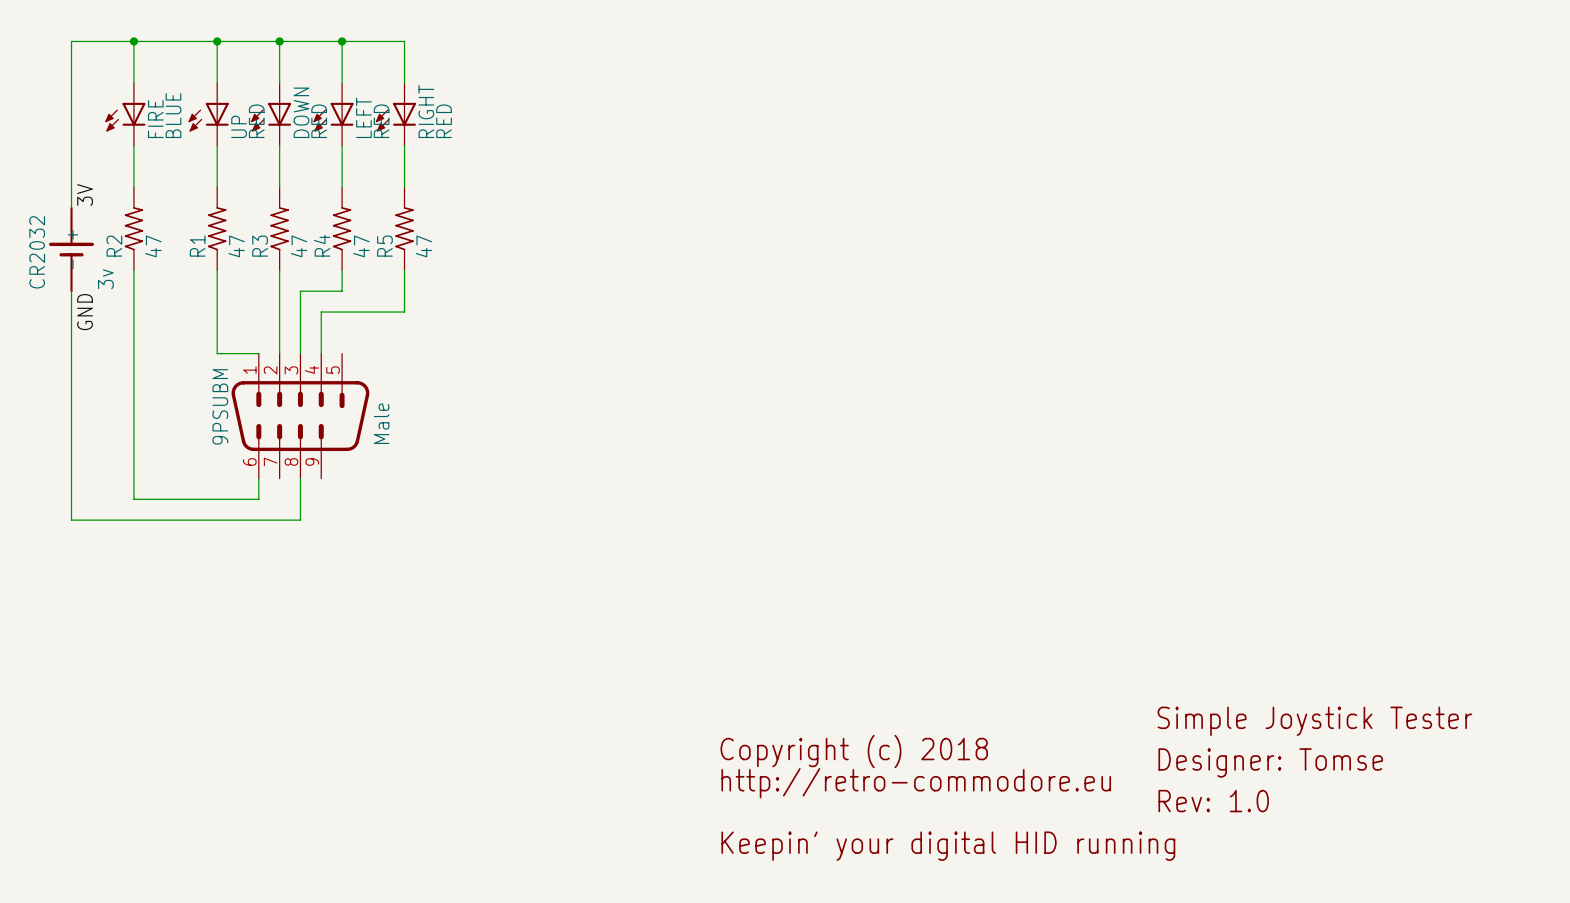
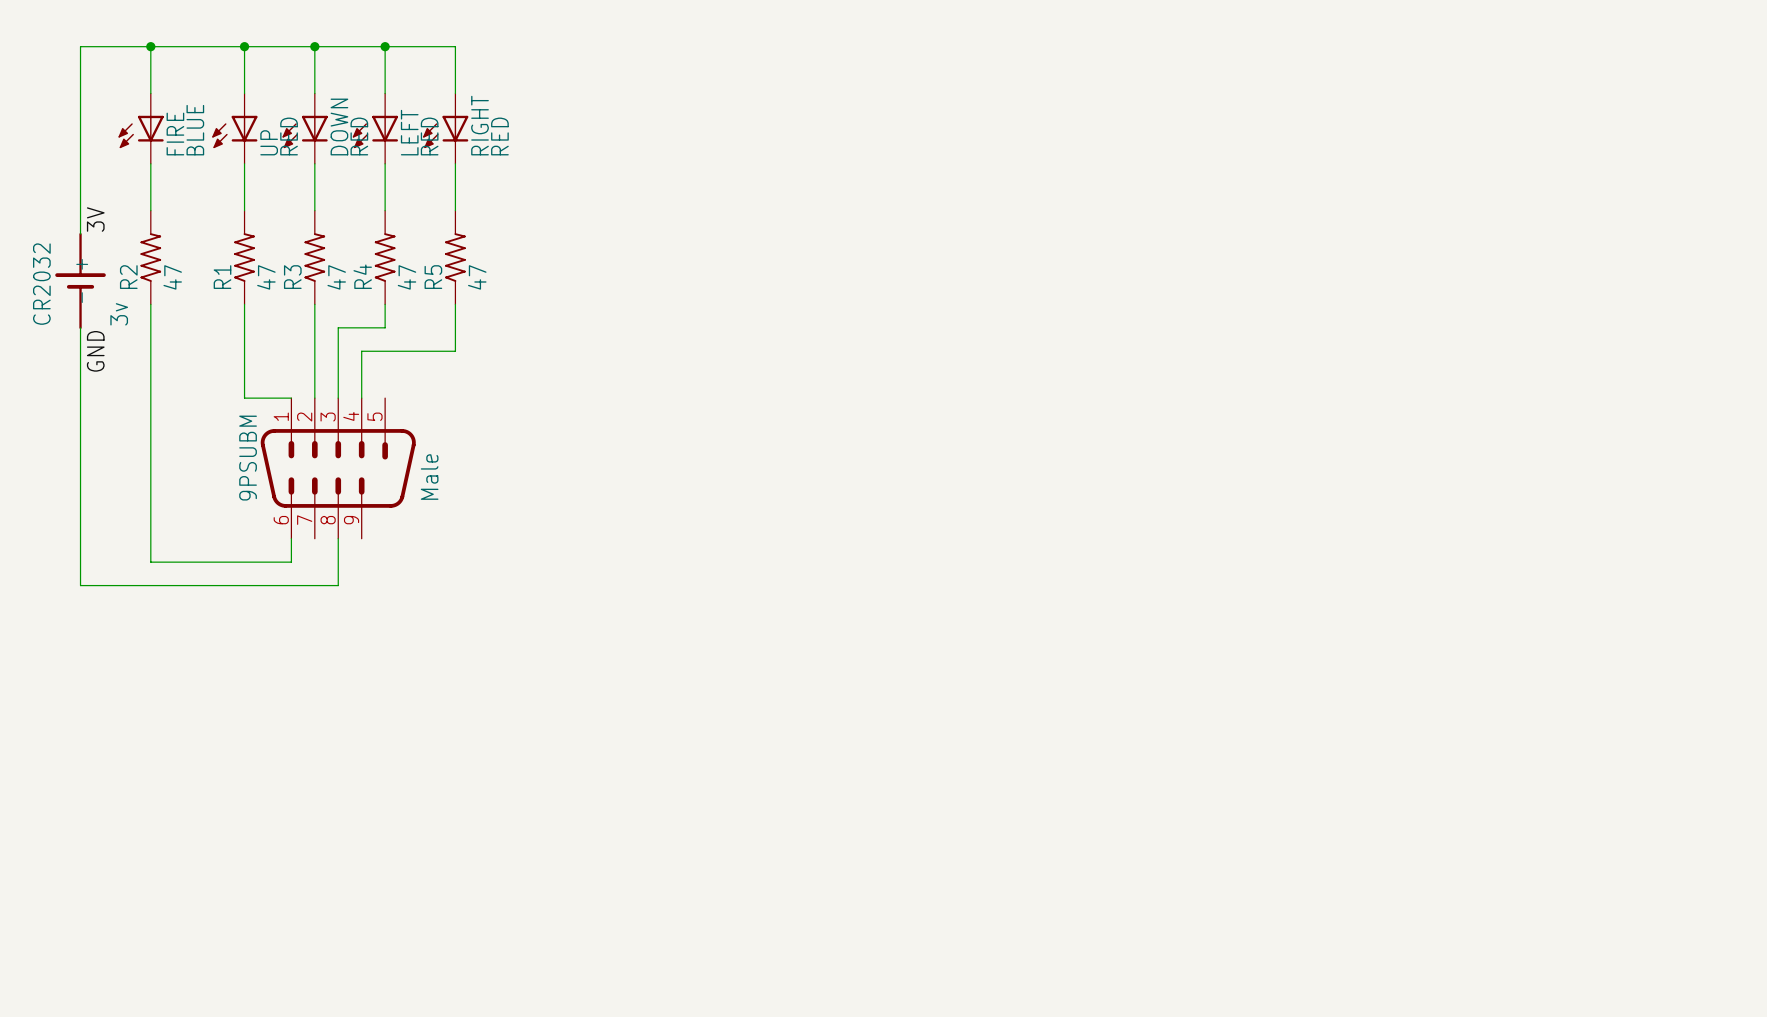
text: Simple Joystick Tester (1314, 721) -> none
text: Copyright (c) 2018 (854, 751) -> none
text: Designer: Tomse (1270, 762) -> none
text: http://retro-commodore.eu (916, 783) -> none
text: Rev: 1.0 (1213, 801) -> none
text: Keepin' your digital HID running (948, 846) -> none

